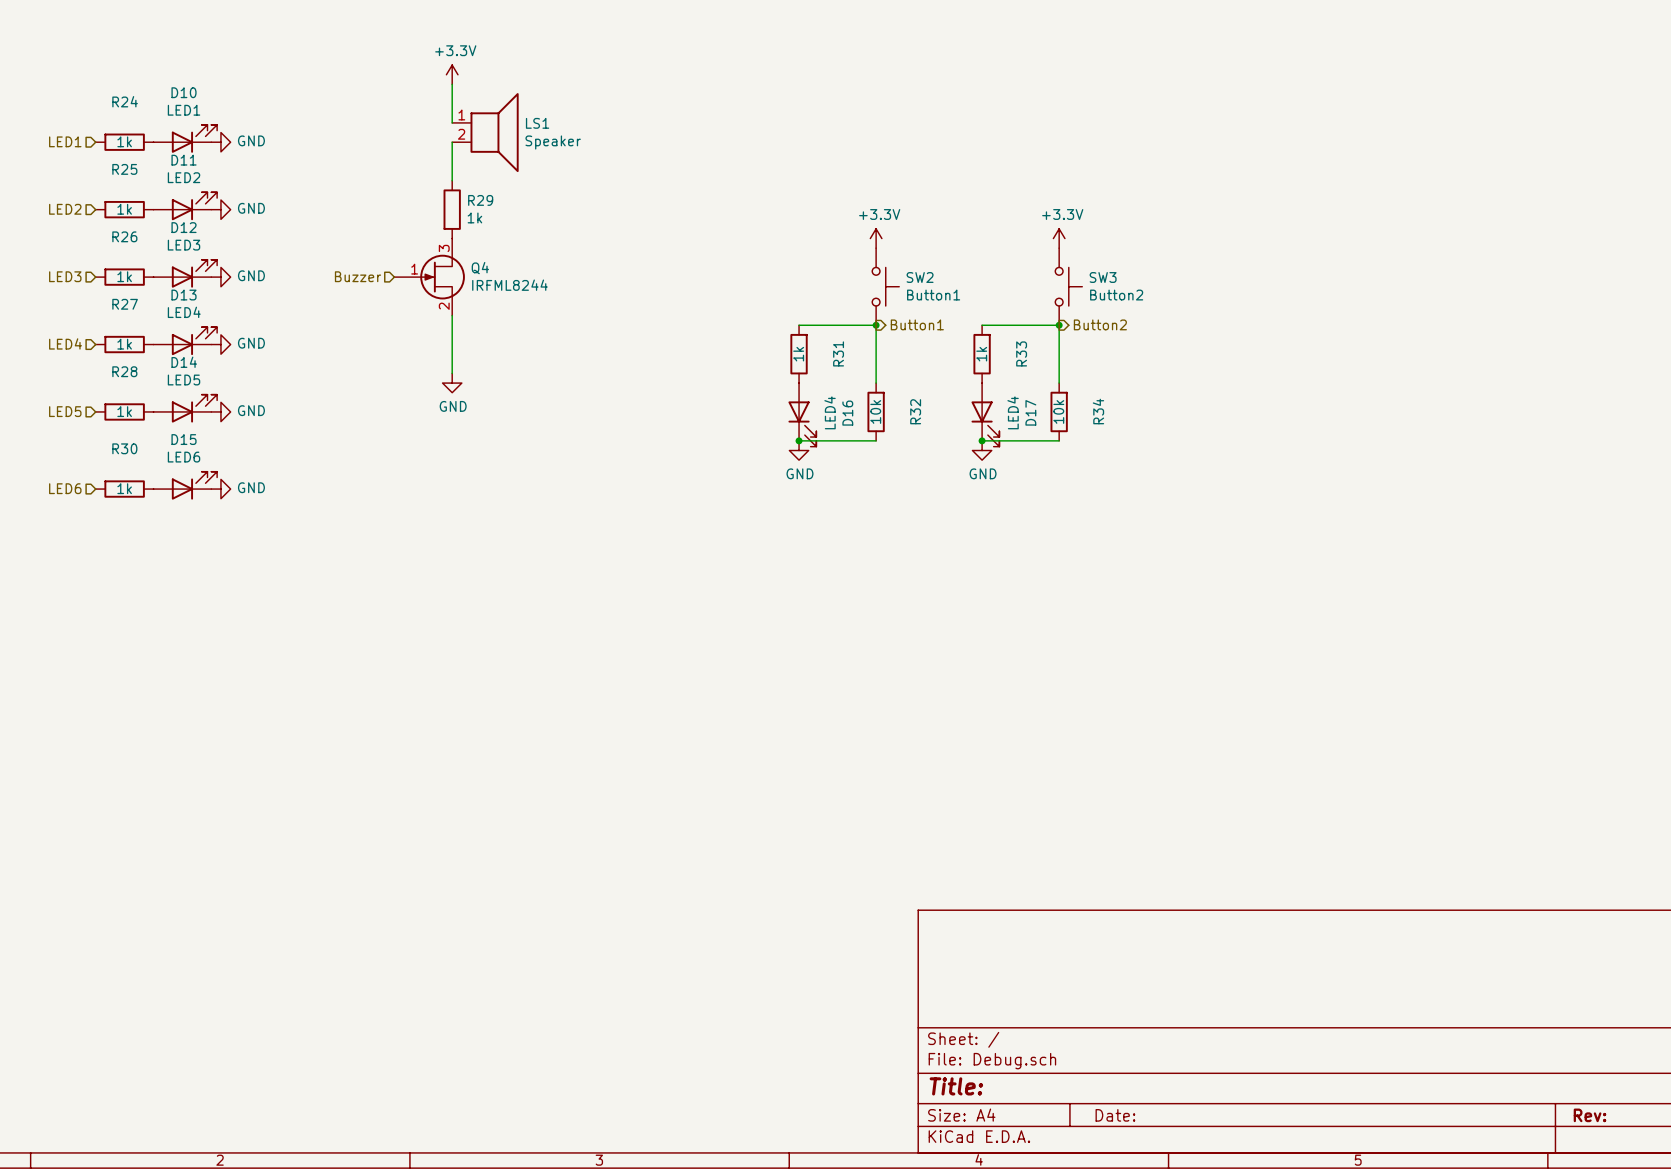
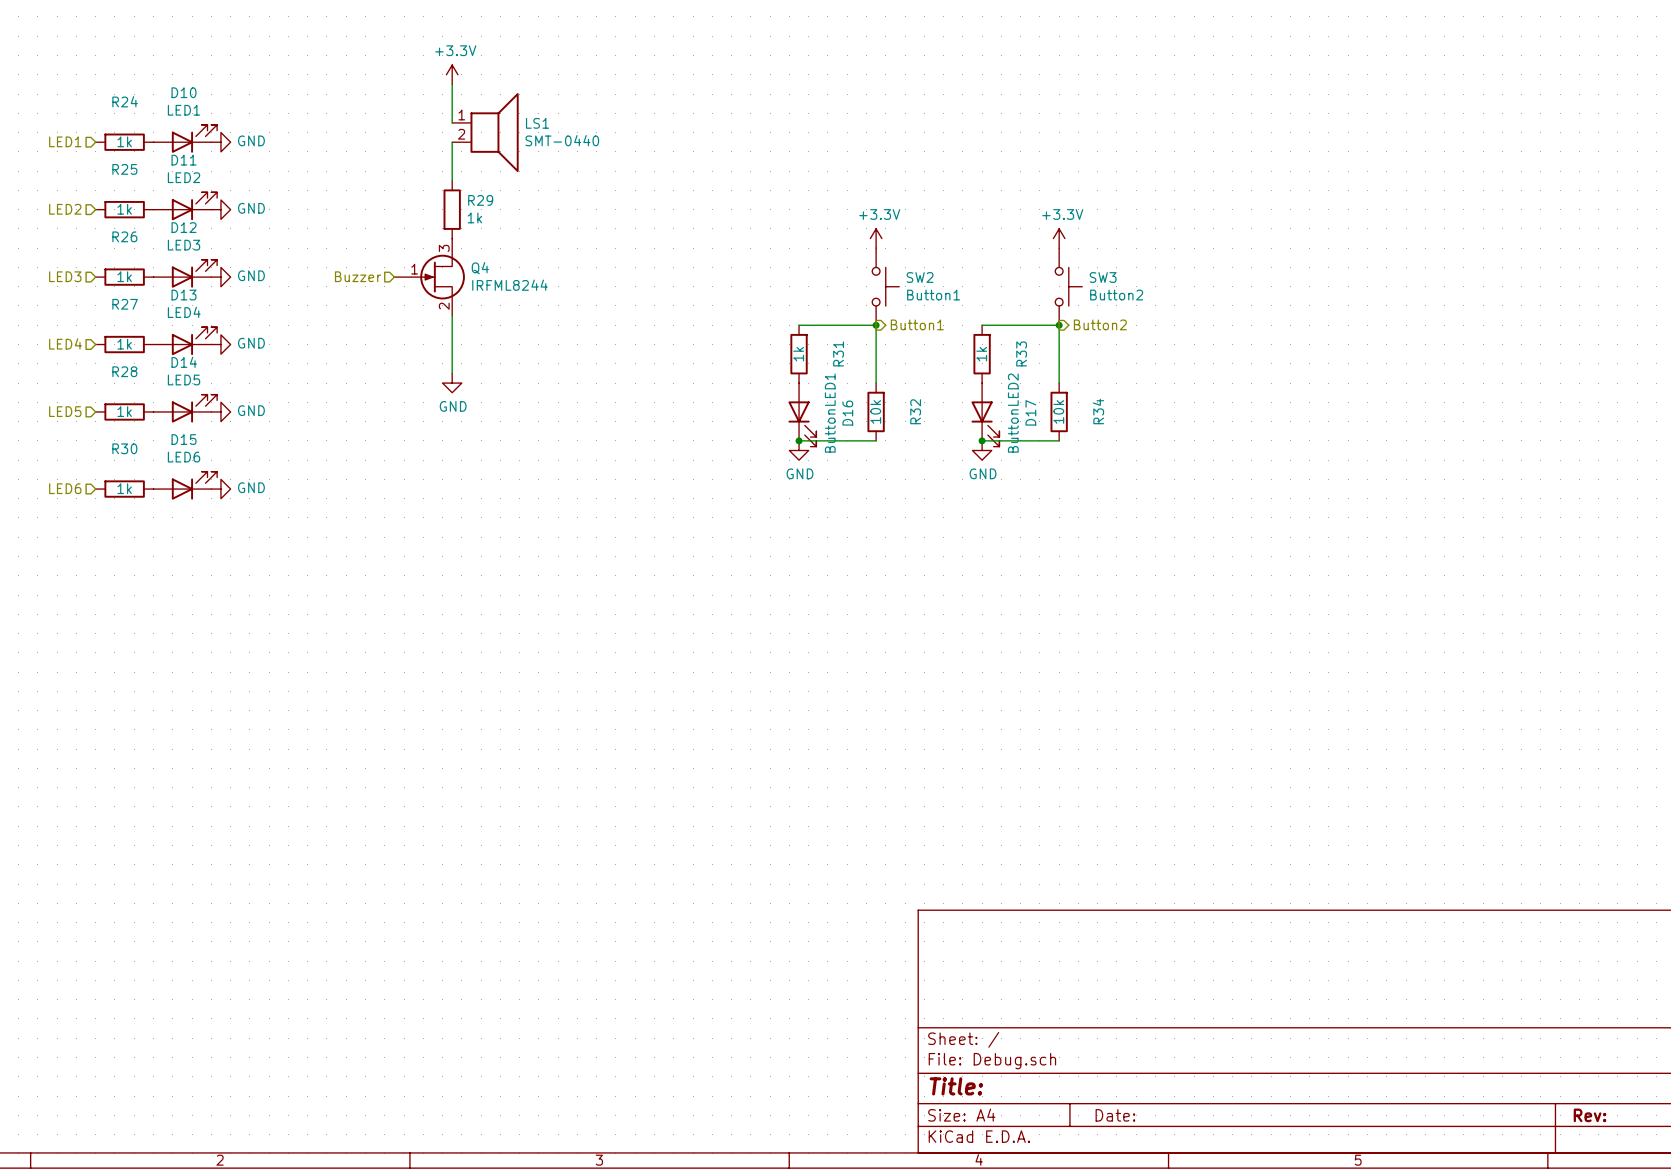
LS1 value: Speaker (553, 142) -> SMT-0440 (562, 140)
D16 value: LED4 (830, 412) -> ButtonLED1 (830, 413)
D17 value: LED4 (1013, 412) -> ButtonLED2 (1013, 413)

